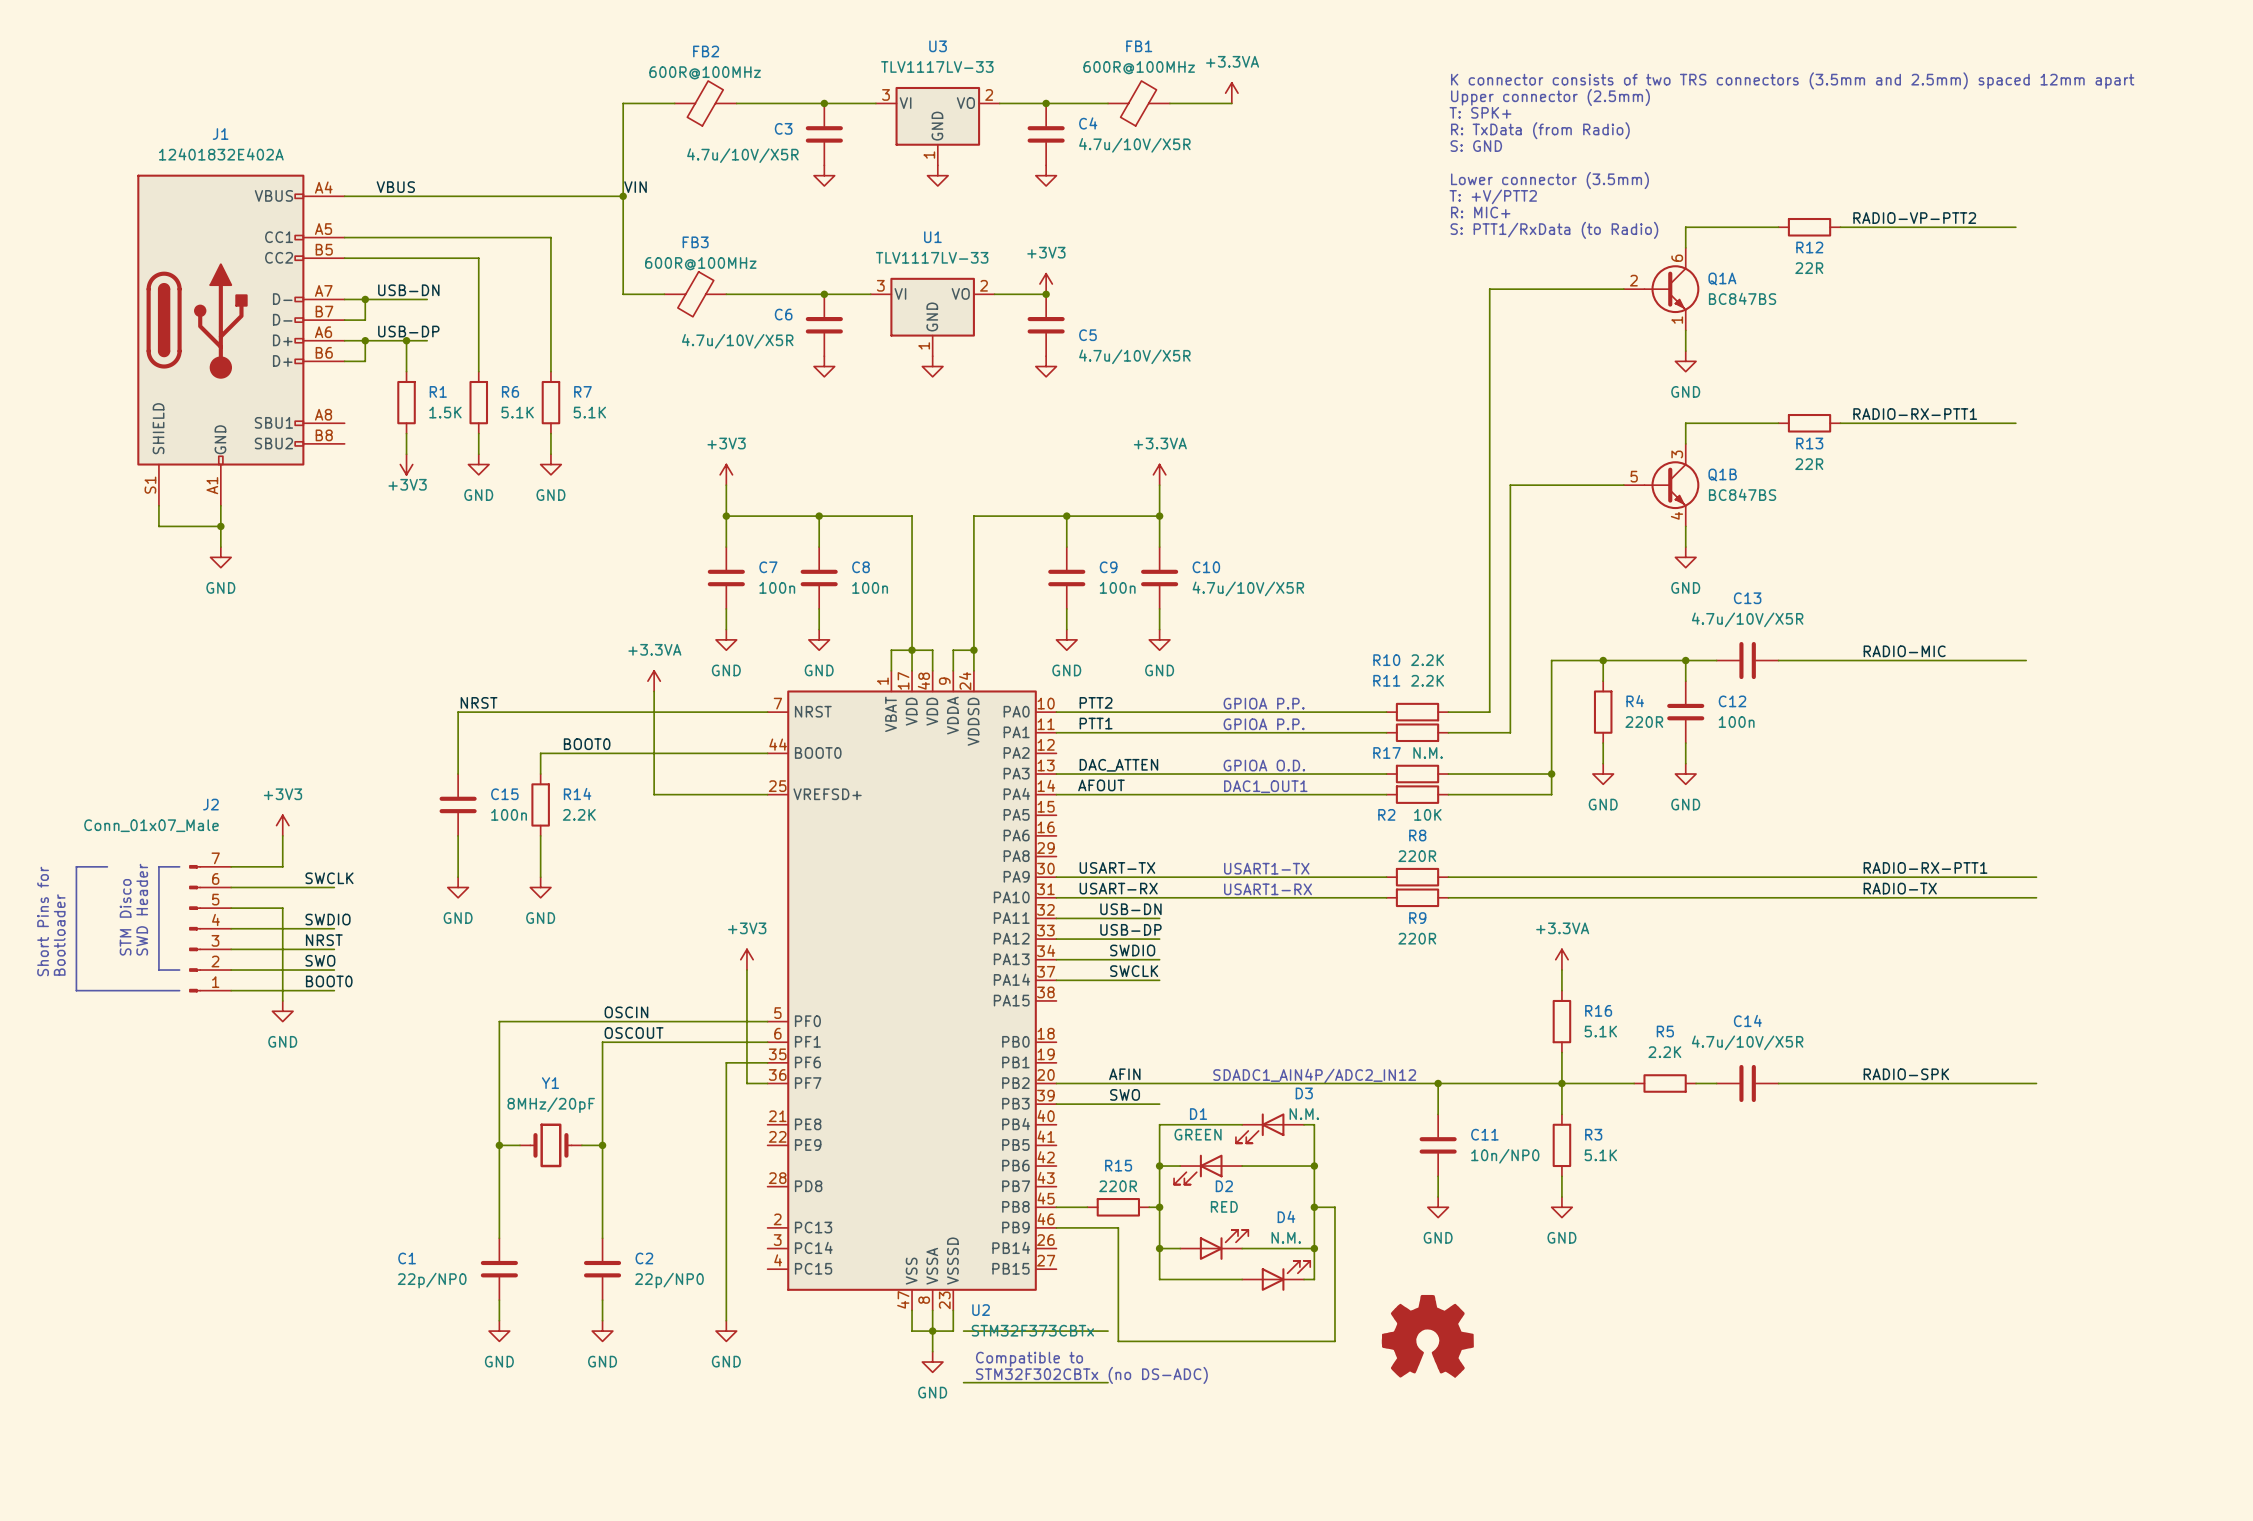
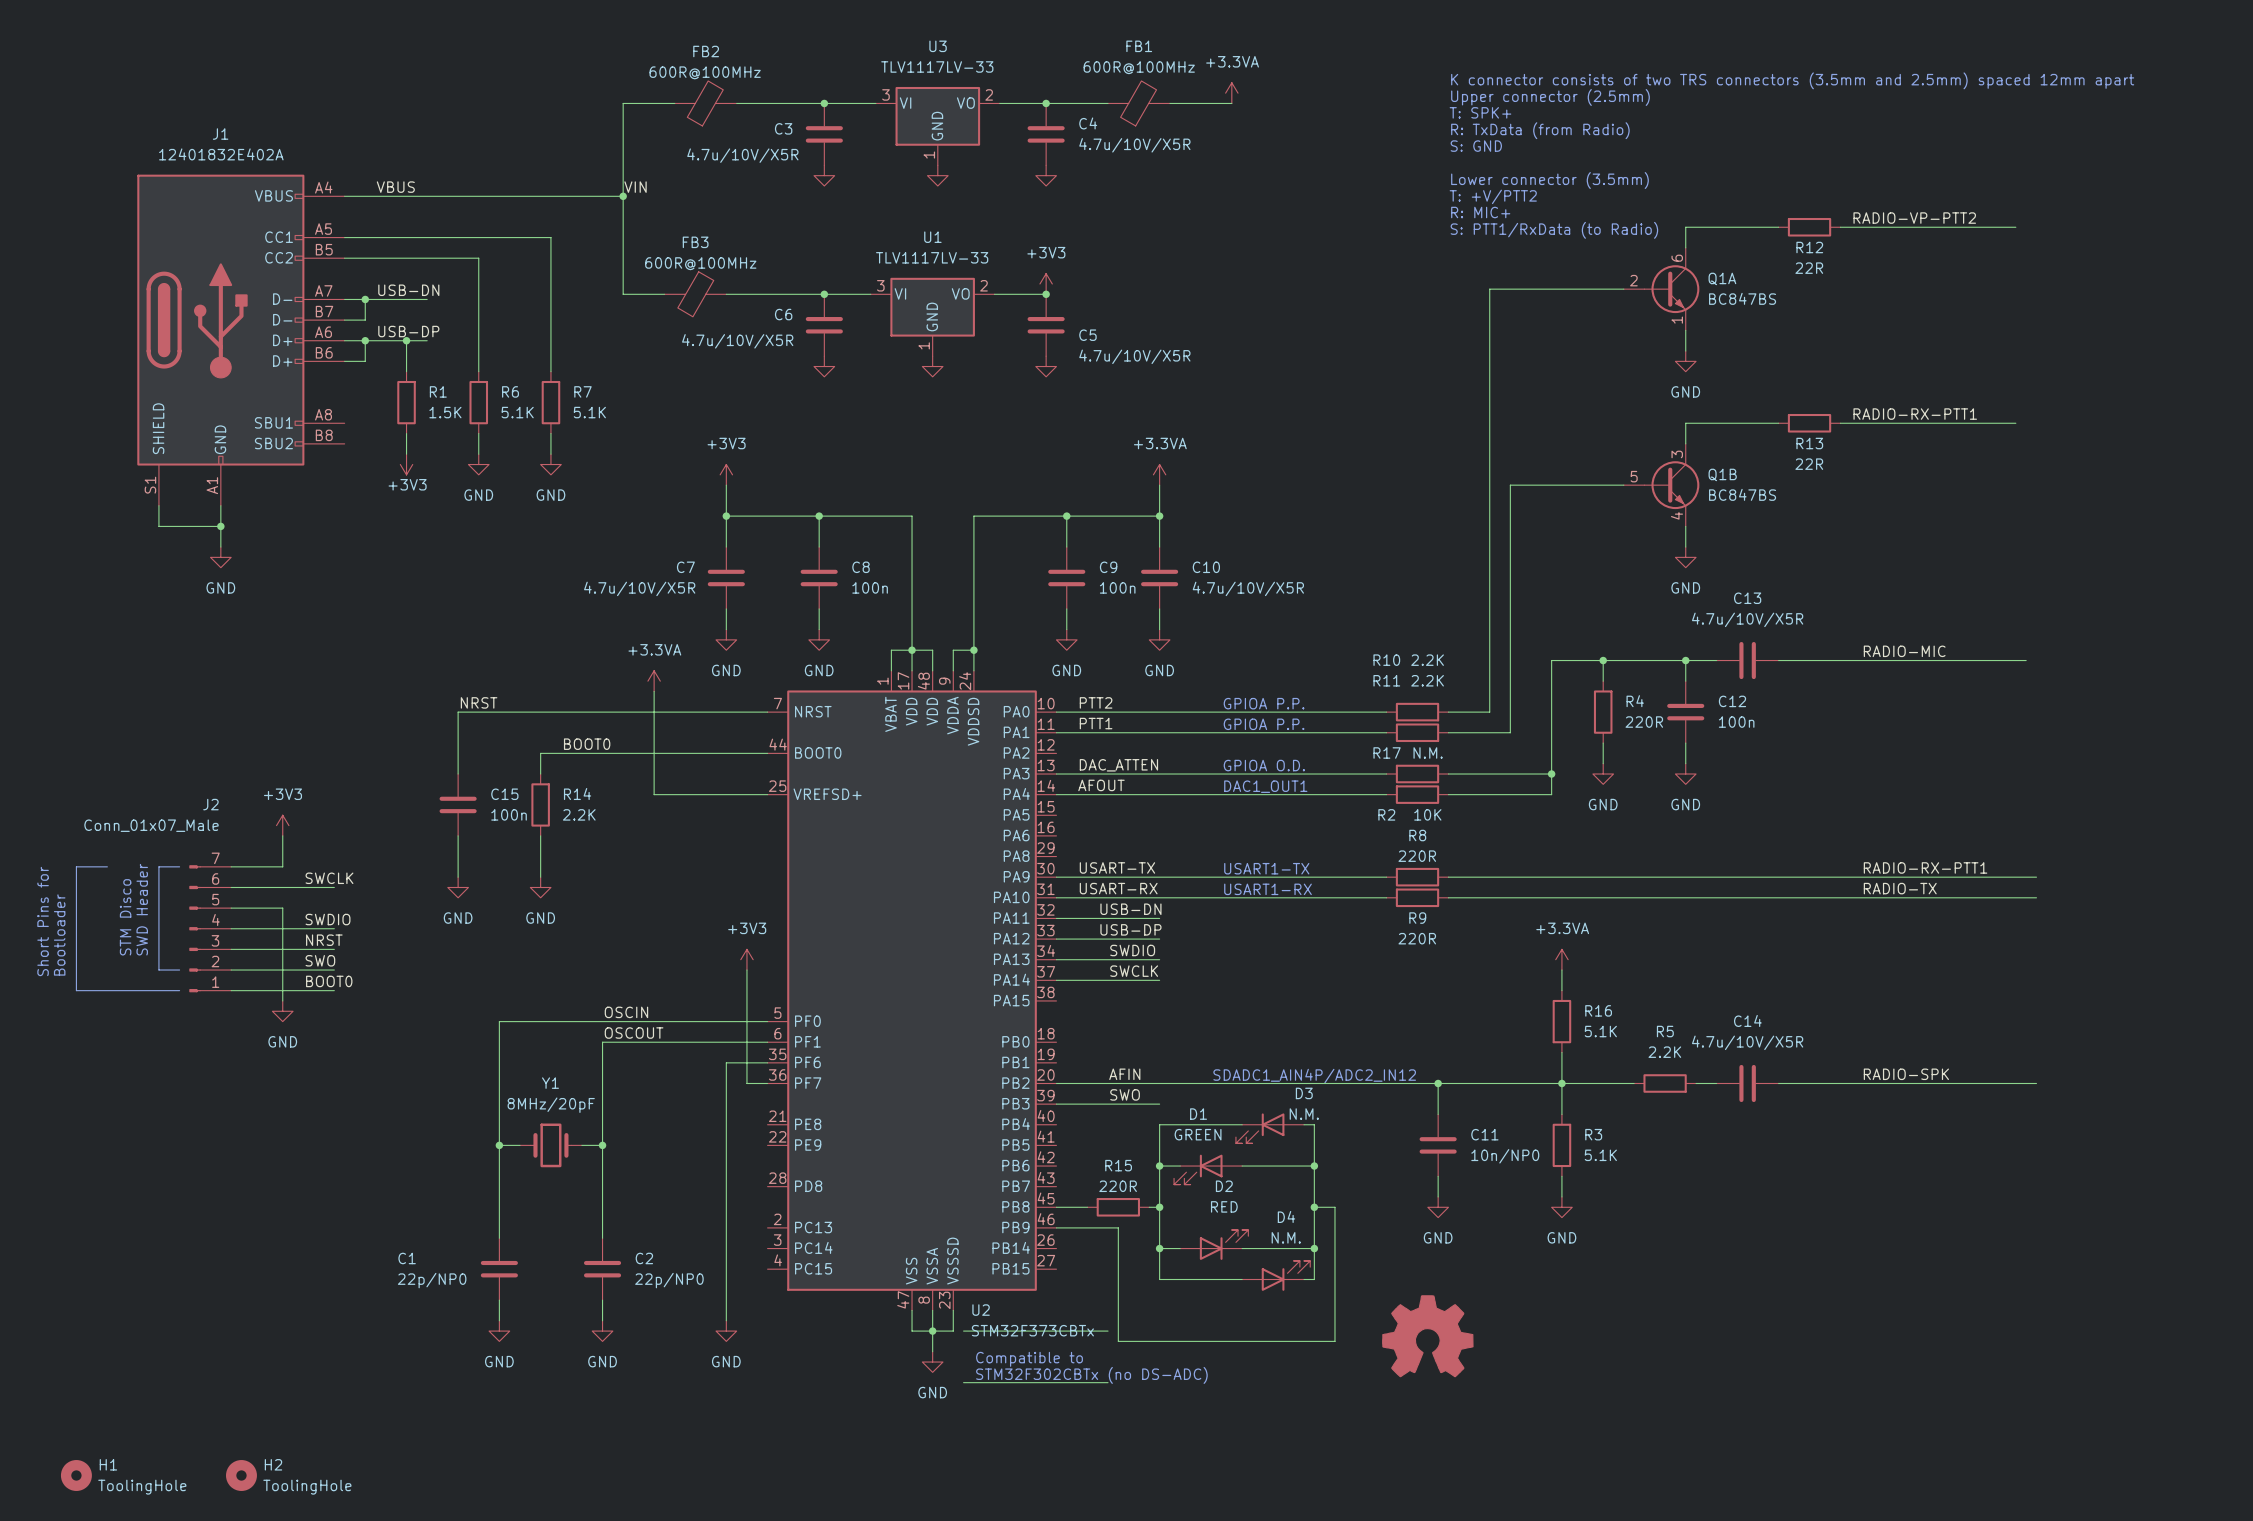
C7 name position: C7 (768, 567) -> C7 (685, 567)
C7 value: 100n (777, 587) -> 4.7u/10V/X5R (639, 588)
H1: none -> ToolingHole (76, 1475)
H2: none -> ToolingHole (241, 1475)

